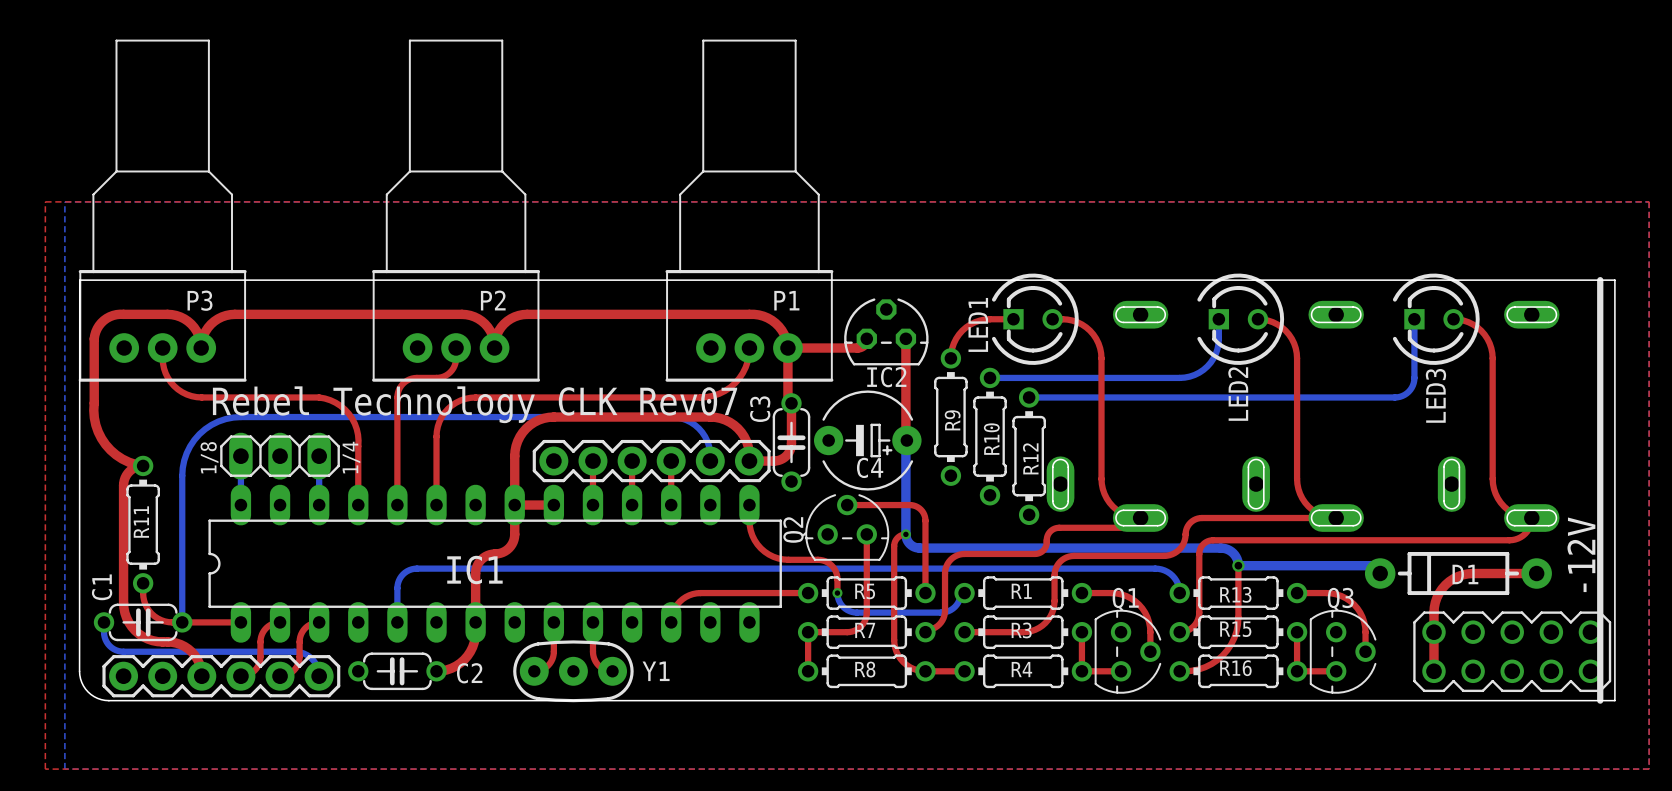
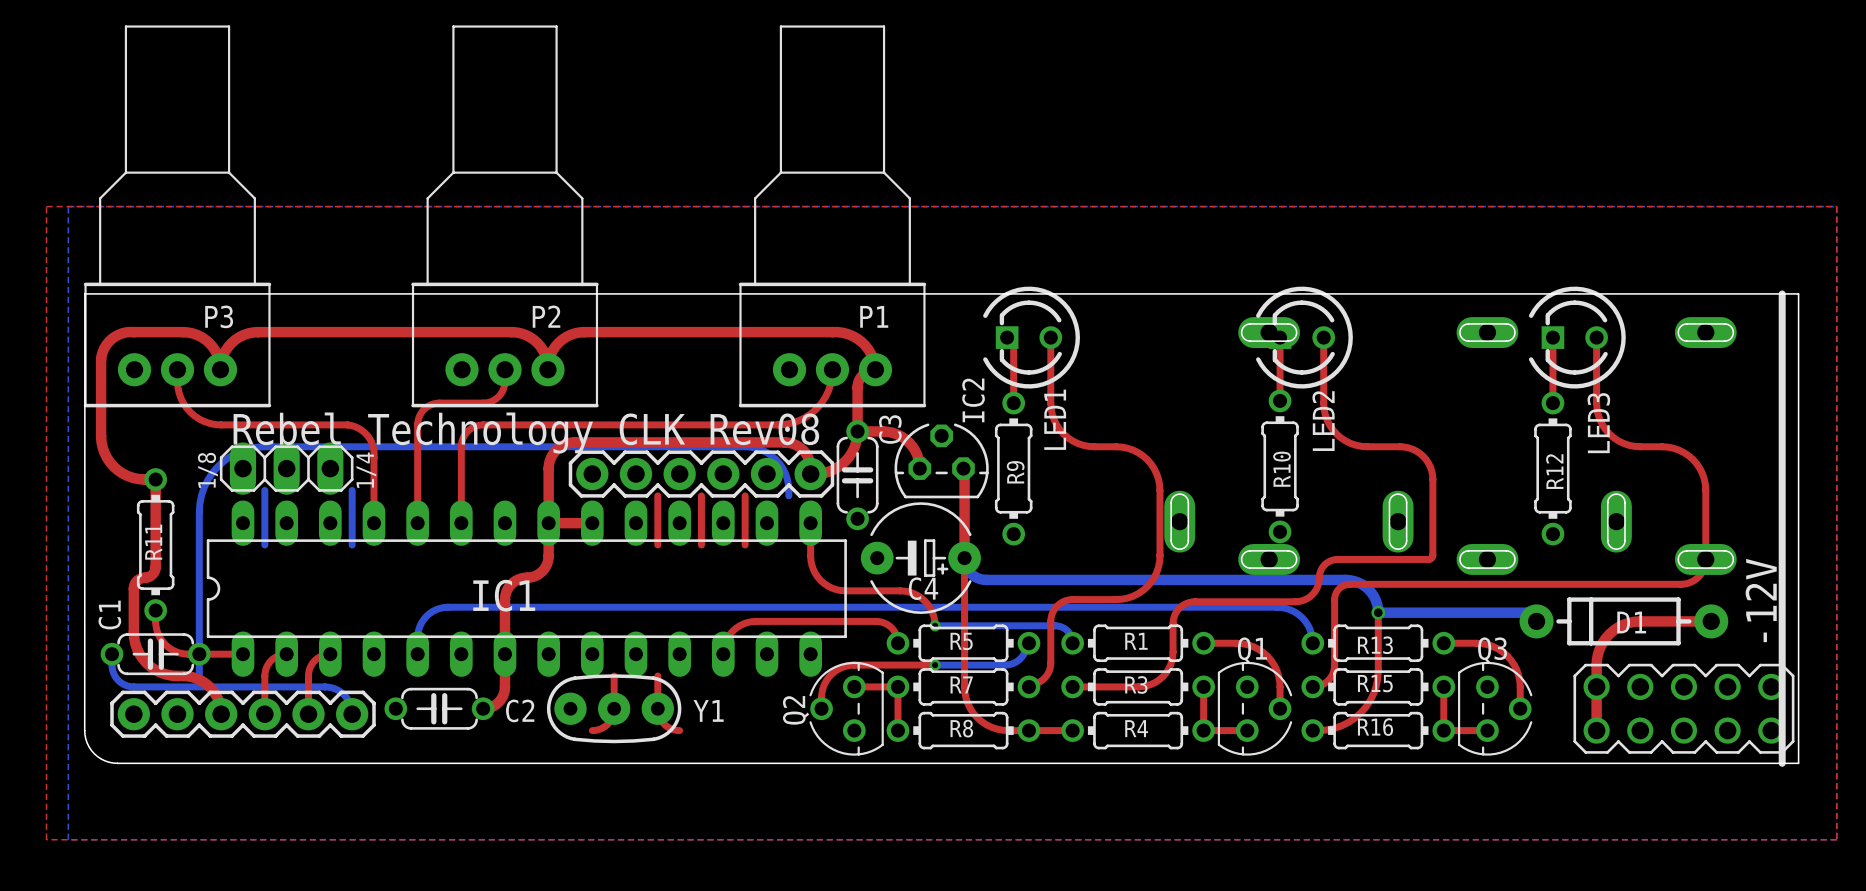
top track: none -> (1007, 337) (1011, 338) (1013, 343) (1013, 403)
top track: (1013, 319) (984, 319) (970, 324) (956, 338) (950, 358) -> none
LED1 position: (1035, 319) -> (1031, 337)
top track: (1052, 319) (1067, 319) (1081, 324) (1093, 334) (1098, 343) (1101, 358) (1102, 489) (1109, 502) (1116, 509) (1125, 515) (1140, 518) (1140, 520) (1137, 524) (1132, 527) (1055, 528) (1048, 534) (1045, 546) (1039, 553) (1003, 553) -> (1050, 337) (1051, 408) (1059, 429) (1072, 440) (1083, 445) (1122, 447) (1138, 452) (1150, 463) (1158, 479) (1159, 555) (1156, 572) (1150, 582) (1138, 593) (1116, 599)
top track: none -> (1280, 337) (1280, 400)
bottom track: (1218, 319) (1218, 343) (1213, 358) (1203, 369) (1189, 376) (990, 377) -> none
LED2 position: (1240, 319) -> (1304, 337)
top track: (1257, 319) (1268, 320) (1281, 327) (1289, 334) (1295, 348) (1297, 478) (1300, 493) (1305, 502) (1316, 512) (1336, 518) (1283, 518) -> (1323, 337) (1324, 408) (1332, 429) (1345, 440) (1356, 445) (1404, 447) (1412, 449) (1423, 456) (1430, 466) (1432, 479) (1432, 555) (1428, 559)
top track: none -> (1552, 337) (1552, 403)
bottom track: (1414, 319) (1414, 380) (1408, 391) (1399, 396) (1029, 397) -> none
LED3 position: (1436, 319) -> (1577, 337)
top track: (1453, 319) (1468, 322) (1477, 327) (1484, 334) (1491, 348) (1492, 478) (1495, 493) (1504, 506) (1512, 512) (1531, 518) -> (1596, 337) (1597, 408) (1605, 429) (1613, 437) (1628, 445) (1667, 447) (1678, 450) (1693, 459) (1702, 473) (1705, 490) (1705, 559)
LED1 name position: LED1 (978, 324) -> LED1 (1055, 419)
IC2 position: (886, 331) -> (941, 460)
top track: (866, 338) (864, 345) (858, 347) (787, 348) (787, 399) (791, 403) (791, 445) (787, 454) (778, 460) (749, 461) (748, 446) (741, 432) (729, 422) (715, 417) (553, 417) (538, 420) (530, 425) (519, 436) (515, 451) (513, 541) (507, 549) (485, 556) (477, 566) (475, 637) (470, 651) (456, 666) (436, 671) -> none
top track: (905, 338) (906, 440) -> none
top track: none -> (875, 369) (864, 373) (858, 382) (857, 431)
top track: (416, 377) (403, 383) (397, 394) (397, 505) -> (461, 403) (433, 403) (424, 409) (419, 416) (417, 424) (417, 523)
IC2 name rotation: 0° (886, 377) -> 90° counterclockwise (973, 400)
LED2 name position: LED2 (1238, 394) -> LED2 (1323, 421)
top track: (315, 397) (330, 400) (340, 405) (348, 413) (354, 423) (358, 440) (358, 505) -> (347, 424) (355, 426) (365, 433) (373, 446) (373, 523)
top track: (475, 397) (456, 402) (444, 412) (439, 421) (436, 436) (436, 505) -> (526, 424) (480, 425) (472, 427) (464, 435) (461, 446) (461, 523)
top track: (94, 403) (95, 424) (105, 444) (122, 459) (143, 465) (131, 469) (124, 480) (123, 544) -> (101, 431) (104, 452) (113, 466) (133, 478) (155, 479) (155, 569) (150, 576) (137, 580) (133, 588)
top track: none -> (857, 431) (887, 431) (901, 436) (914, 450) (919, 468)
top track: none -> (857, 431) (854, 447) (845, 461) (831, 470) (815, 474) (810, 474) (809, 461) (805, 452) (797, 445) (787, 442) (574, 442) (558, 447) (552, 455) (548, 465) (547, 561) (540, 573) (515, 580) (506, 591) (504, 692) (496, 704) (483, 708)
text: Rebel Technology CLK Rev07 (475, 404) -> Rebel Technology CLK Rev08 (526, 433)
C3 name position: C3 (760, 409) -> C3 (890, 429)
R9 position: (950, 417) -> (1013, 468)
R10 position: (990, 436) -> (1280, 466)
C4 position: (867, 440) -> (920, 558)
bottom track: (906, 440) (906, 536) (908, 542) (914, 547) (1220, 548) (1233, 553) (1238, 565) -> (964, 558) (966, 566) (970, 573) (978, 578) (986, 579) (1349, 580) (1361, 584) (1371, 592) (1377, 604) (1378, 612)
C3 position: (791, 442) -> (857, 475)
part position: (280, 456) -> (286, 468)
R12 position: (1029, 456) -> (1552, 468)
text position: 1/8 (209, 457) -> 1/8 (207, 470)
text position: 1/4 (351, 457) -> 1/4 (366, 470)
part position: (651, 461) -> (701, 474)
top track: none -> (810, 523) (811, 564) (815, 573) (824, 583) (841, 590) (900, 590) (913, 593) (924, 601) (930, 608) (935, 625)
top track: (514, 505) (553, 505) -> (548, 523) (592, 523)
top track: (749, 505) (750, 530) (760, 548) (778, 558) (820, 559) (827, 562) (836, 574) (837, 593) -> none
top track: (847, 505) (909, 505) (920, 509) (925, 520) (925, 593) -> none
R11 position: (143, 524) -> (155, 545)
Q2 rotation: 0° (847, 527) -> 90° counterclockwise (846, 708)
Q2 position: (847, 527) -> (846, 708)
top track: (866, 534) (866, 612) (864, 622) (859, 628) (849, 632) (808, 632) -> (854, 686) (897, 686)
top track: (905, 534) (897, 537) (894, 544) (894, 644) (898, 655) (906, 664) (913, 668) (925, 671) -> (963, 468) (966, 698) (973, 713) (986, 724) (1002, 730) (1028, 730)
via: (905, 534) -> none
top track: none -> (155, 610) (158, 633) (165, 644) (172, 649) (188, 654) (243, 654)
IC1 position: (495, 563) -> (526, 588)
bottom track: none -> (935, 625) (1057, 625) (1067, 630) (1072, 643)
via: none -> (935, 625)
top track: (123, 583) (123, 607) (131, 626) (147, 638) (176, 643) (188, 649) (199, 663) (201, 676) -> (133, 632) (137, 649) (146, 663) (160, 672) (192, 677) (206, 683) (216, 695) (221, 714)
top track: (143, 583) (145, 604) (151, 613) (161, 620) (172, 622) (240, 622) -> none
top track: (808, 593) (692, 594) (677, 604) (671, 622) -> (897, 643) (893, 629) (887, 624) (878, 621) (756, 621) (743, 623) (732, 631) (725, 641) (723, 654)
bottom track: (837, 593) (843, 606) (857, 612) -> (935, 665) (952, 665)
via: (837, 593) -> none
bottom track: (964, 593) (960, 593) (956, 604) (946, 611) (903, 612) -> (1028, 643) (1026, 643) (1025, 651) (1020, 658) (1013, 663) (1004, 665)
bottom track: (1179, 593) (1177, 583) (1172, 575) (1164, 570) (1155, 568) (416, 568) (407, 571) (398, 580) (397, 622) -> (1312, 643) (1310, 629) (1302, 617) (1290, 609) (1276, 607) (448, 607) (432, 611) (421, 622) (417, 633) (417, 654)
top track: none -> (286, 654) (275, 657) (266, 667) (264, 714)
top track: none -> (330, 654) (319, 657) (310, 667) (308, 714)
top track: none -> (935, 665) (854, 665) (841, 667) (831, 674) (824, 685) (821, 708)
via: none -> (935, 665)
bottom track: (104, 622) (106, 641) (118, 651) (297, 651) (306, 655) (314, 661) (319, 676) -> (112, 654) (112, 667) (114, 676) (120, 682) (128, 686) (328, 687) (338, 690) (346, 697) (352, 714)
C1 position: (143, 622) -> (155, 654)
top track: (280, 622) (272, 623) (264, 630) (260, 639) (260, 659) (257, 666) (250, 673) (240, 676) -> none
top track: (319, 622) (311, 623) (303, 630) (299, 639) (299, 659) (296, 666) (289, 673) (280, 676) -> none
C2 position: (397, 671) -> (439, 708)
part position: (573, 671) -> (614, 708)
text position: Y1 (656, 671) -> Y1 (708, 710)
part position: (221, 676) -> (243, 714)

